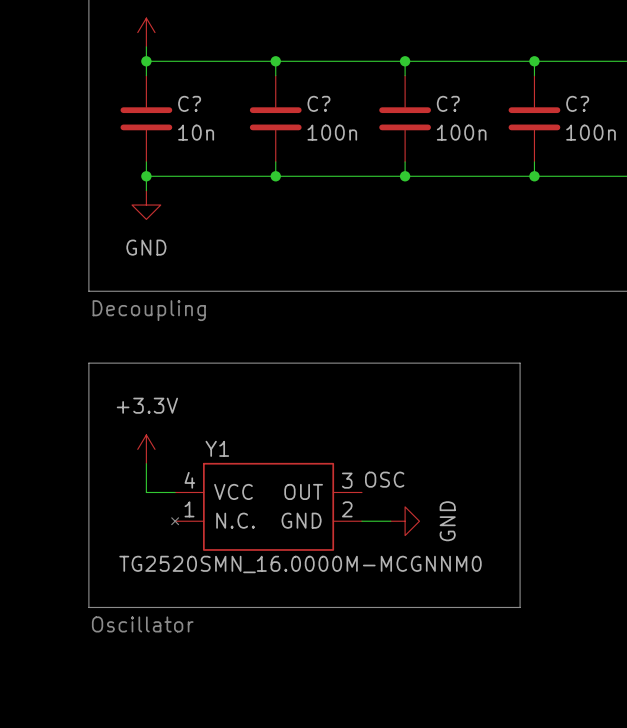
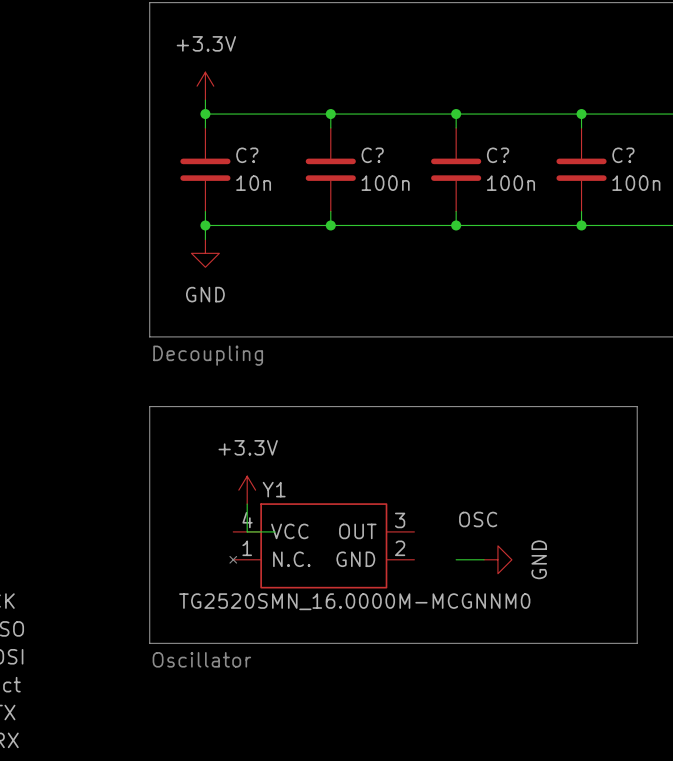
line: (520, 363) (520, 607) -> (567, 406) (637, 406) (637, 643) (567, 643)
power symbol position: +3.3V (146, 449) -> +3.3V (247, 490)
wire: (146, 463) (146, 492) (175, 492) -> (247, 504) (247, 531) (275, 531)
label position: OSC (384, 479) -> OSC (478, 519)
wire: (361, 521) (390, 521) -> (456, 559) (484, 559)
power symbol position: GND (405, 521) -> GND (497, 559)

